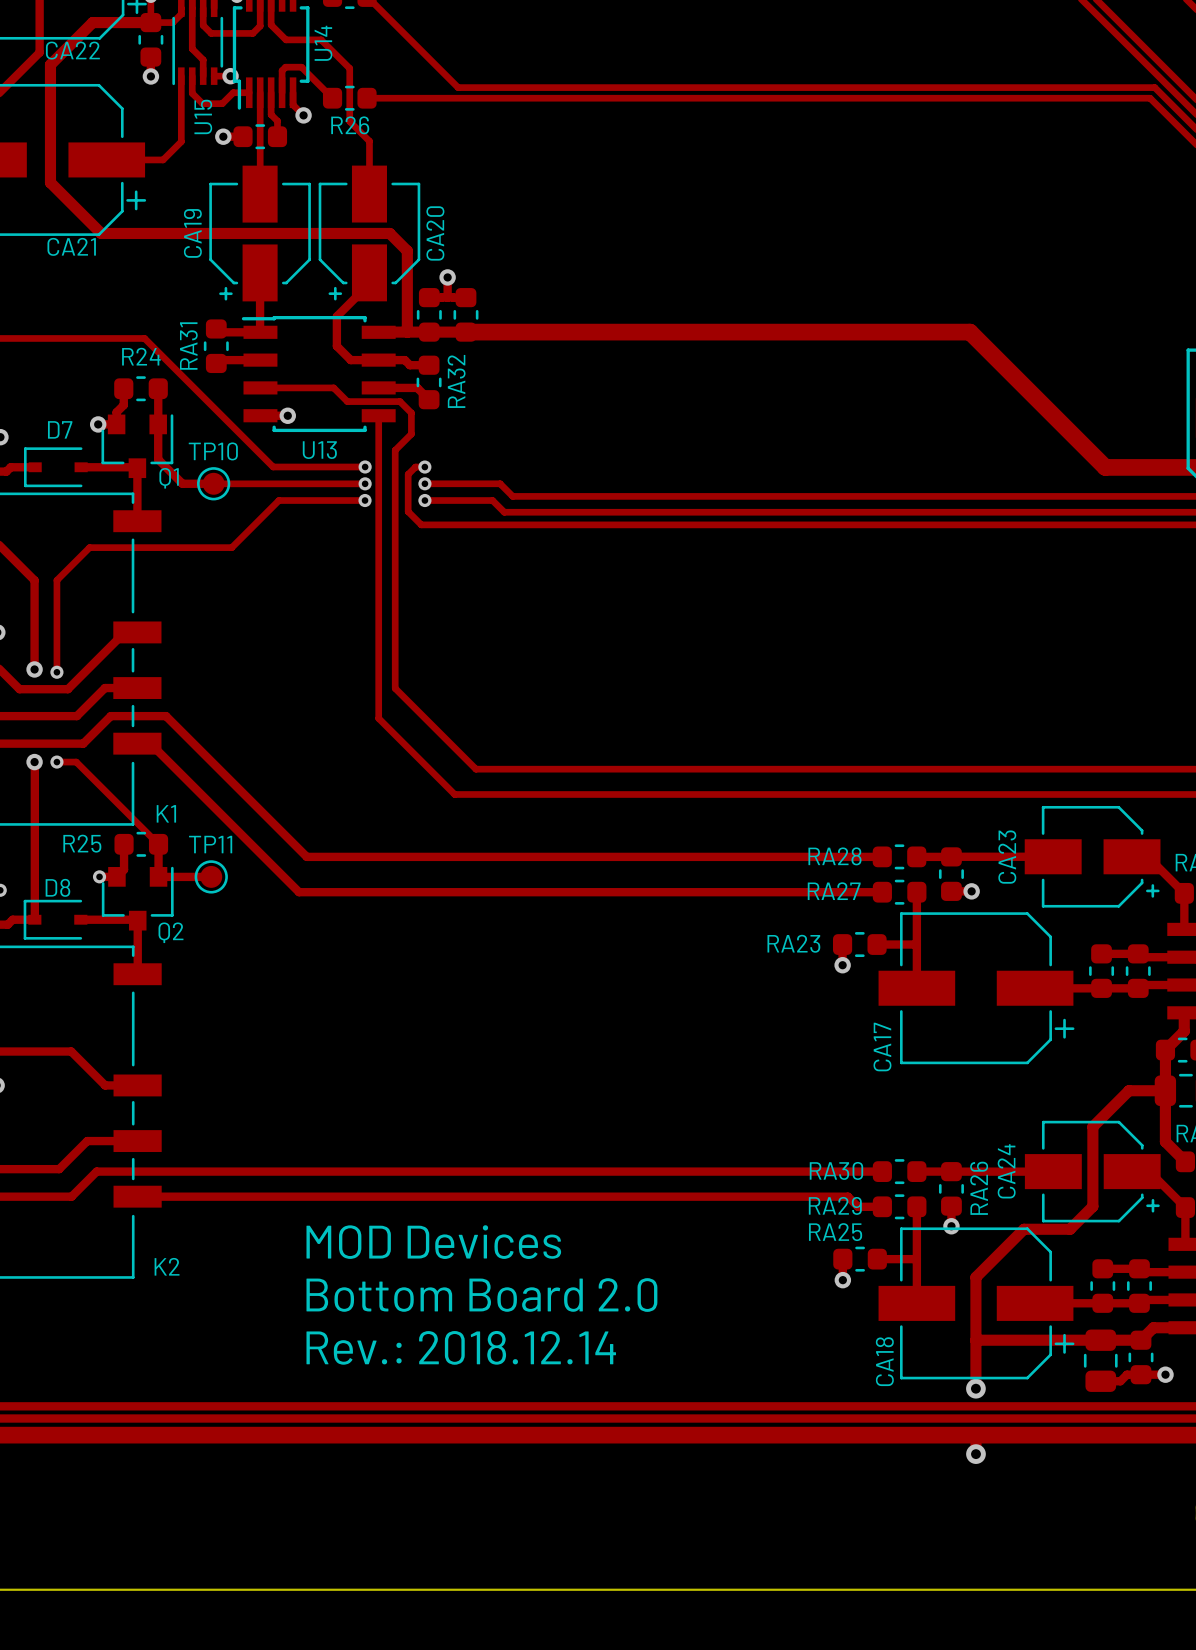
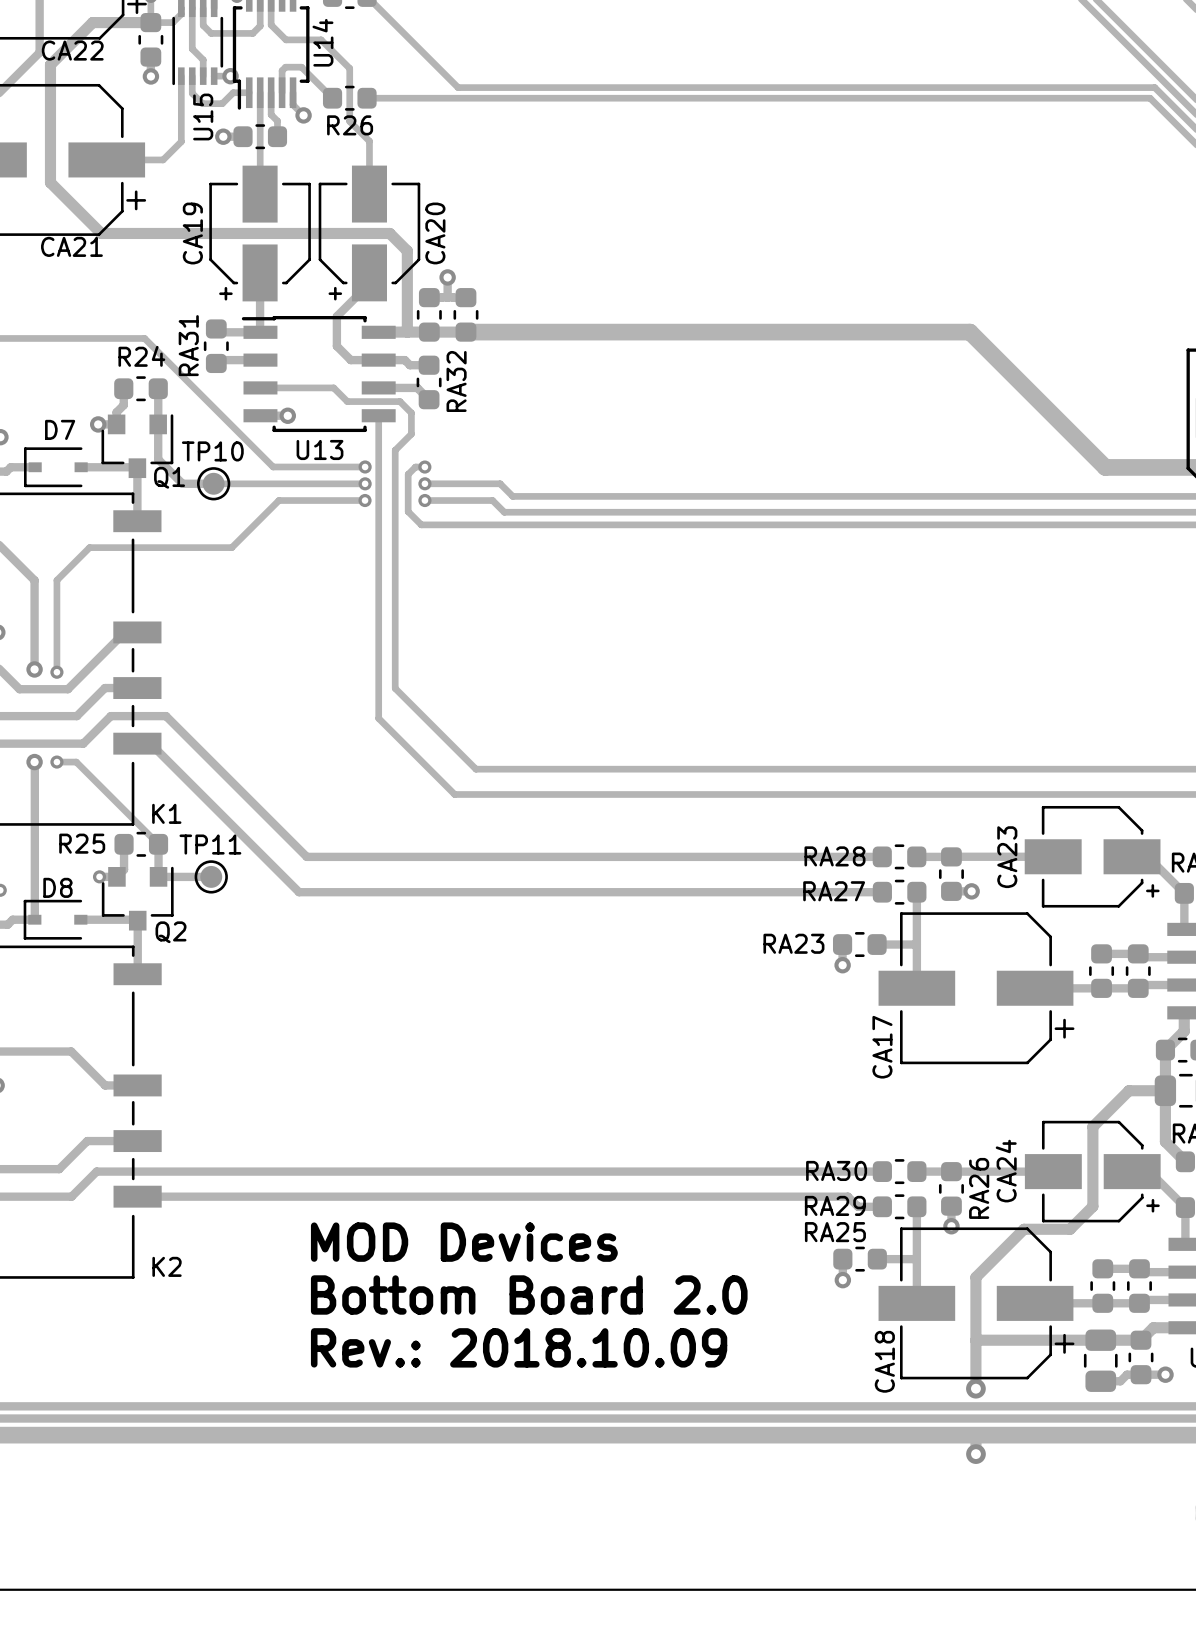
text: Rev.: 2018.12.14 (461, 1347) -> Rev.: 2018.10.09 (519, 1347)

